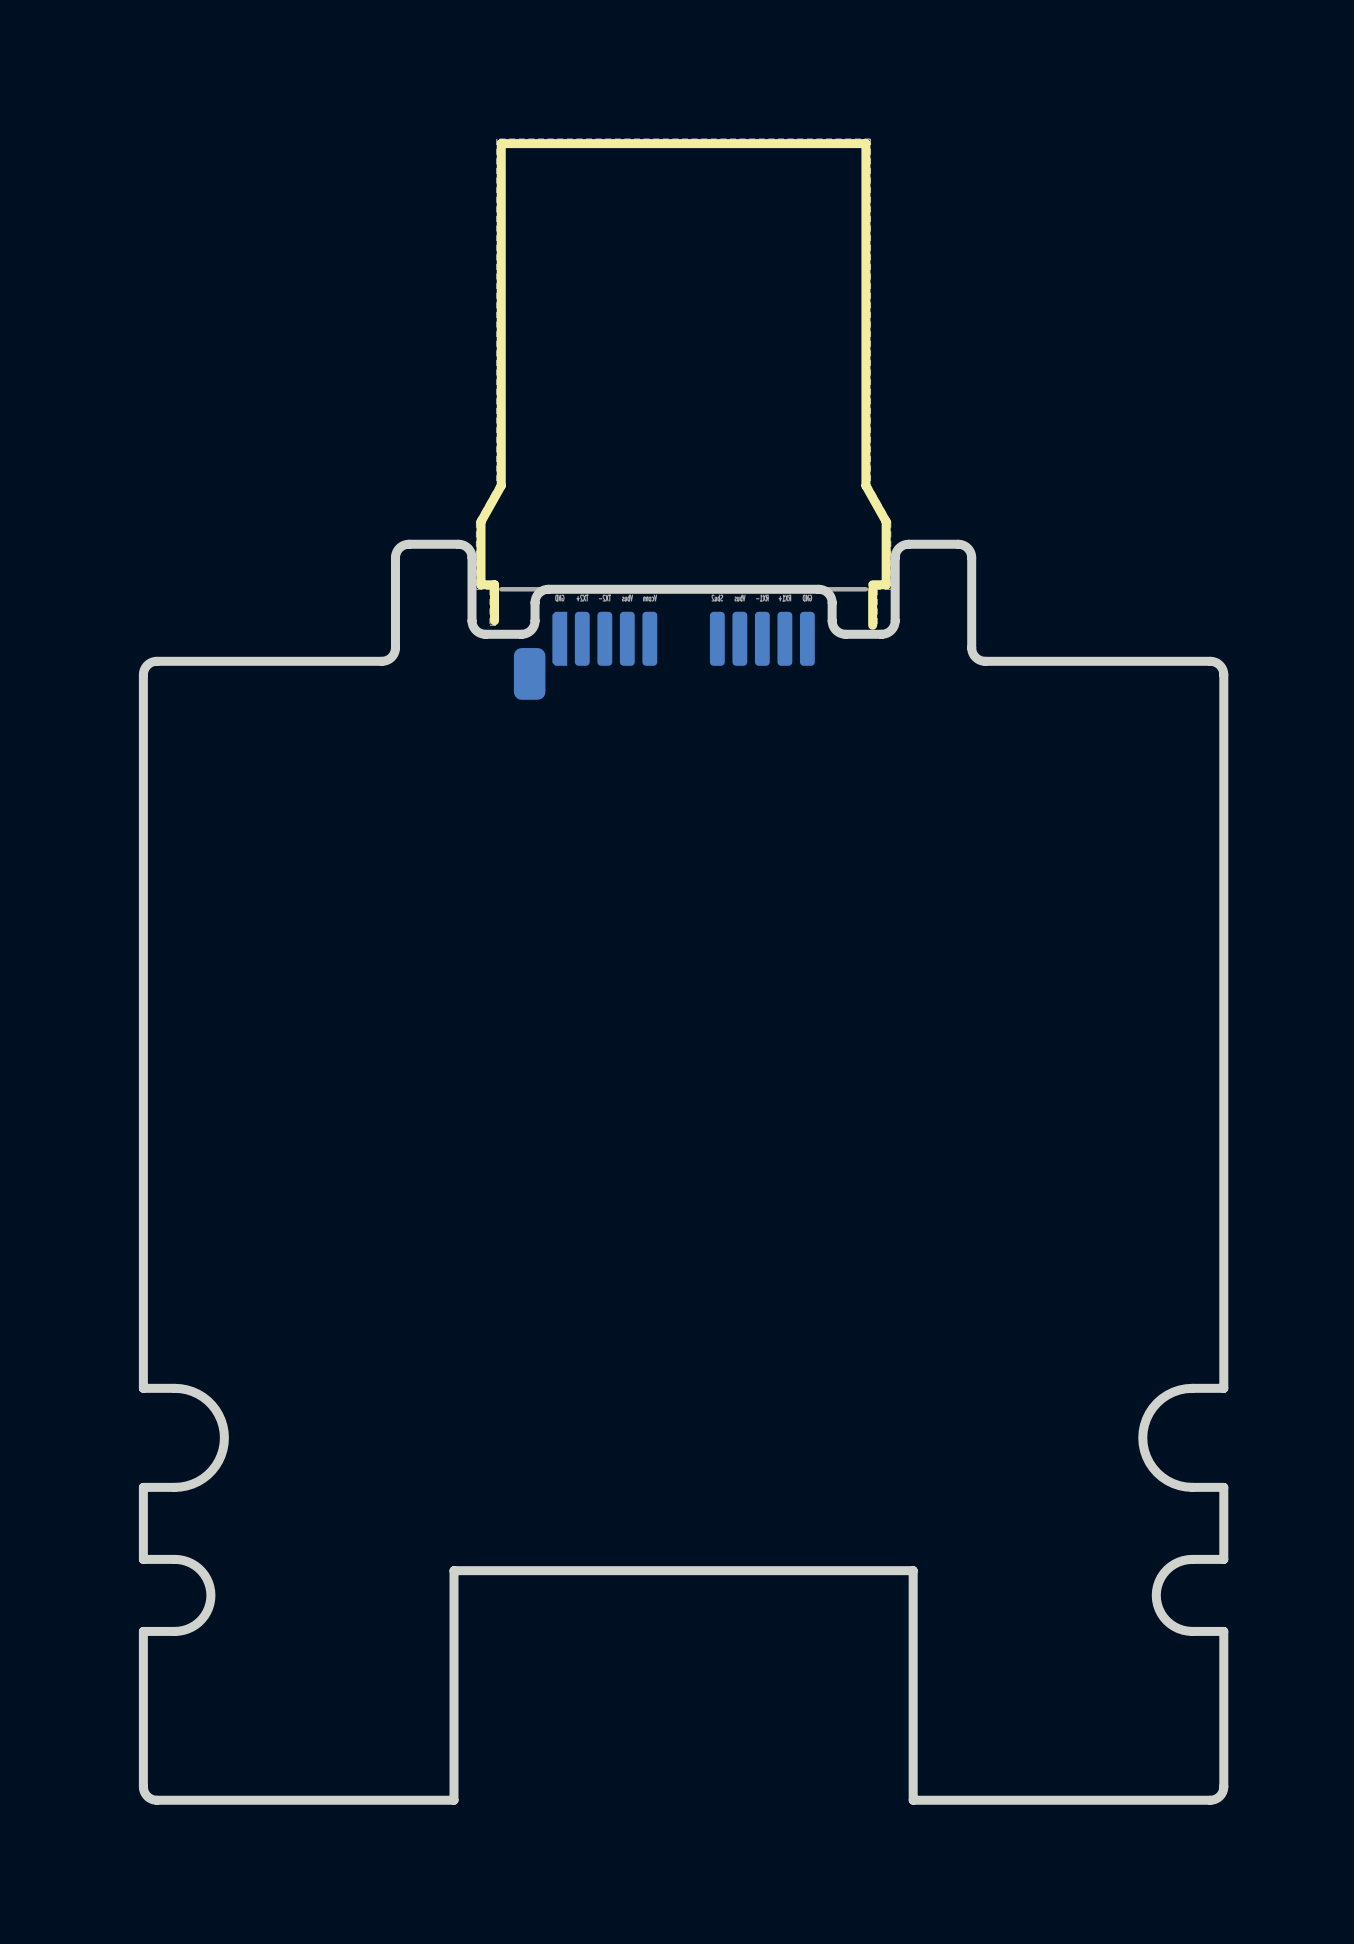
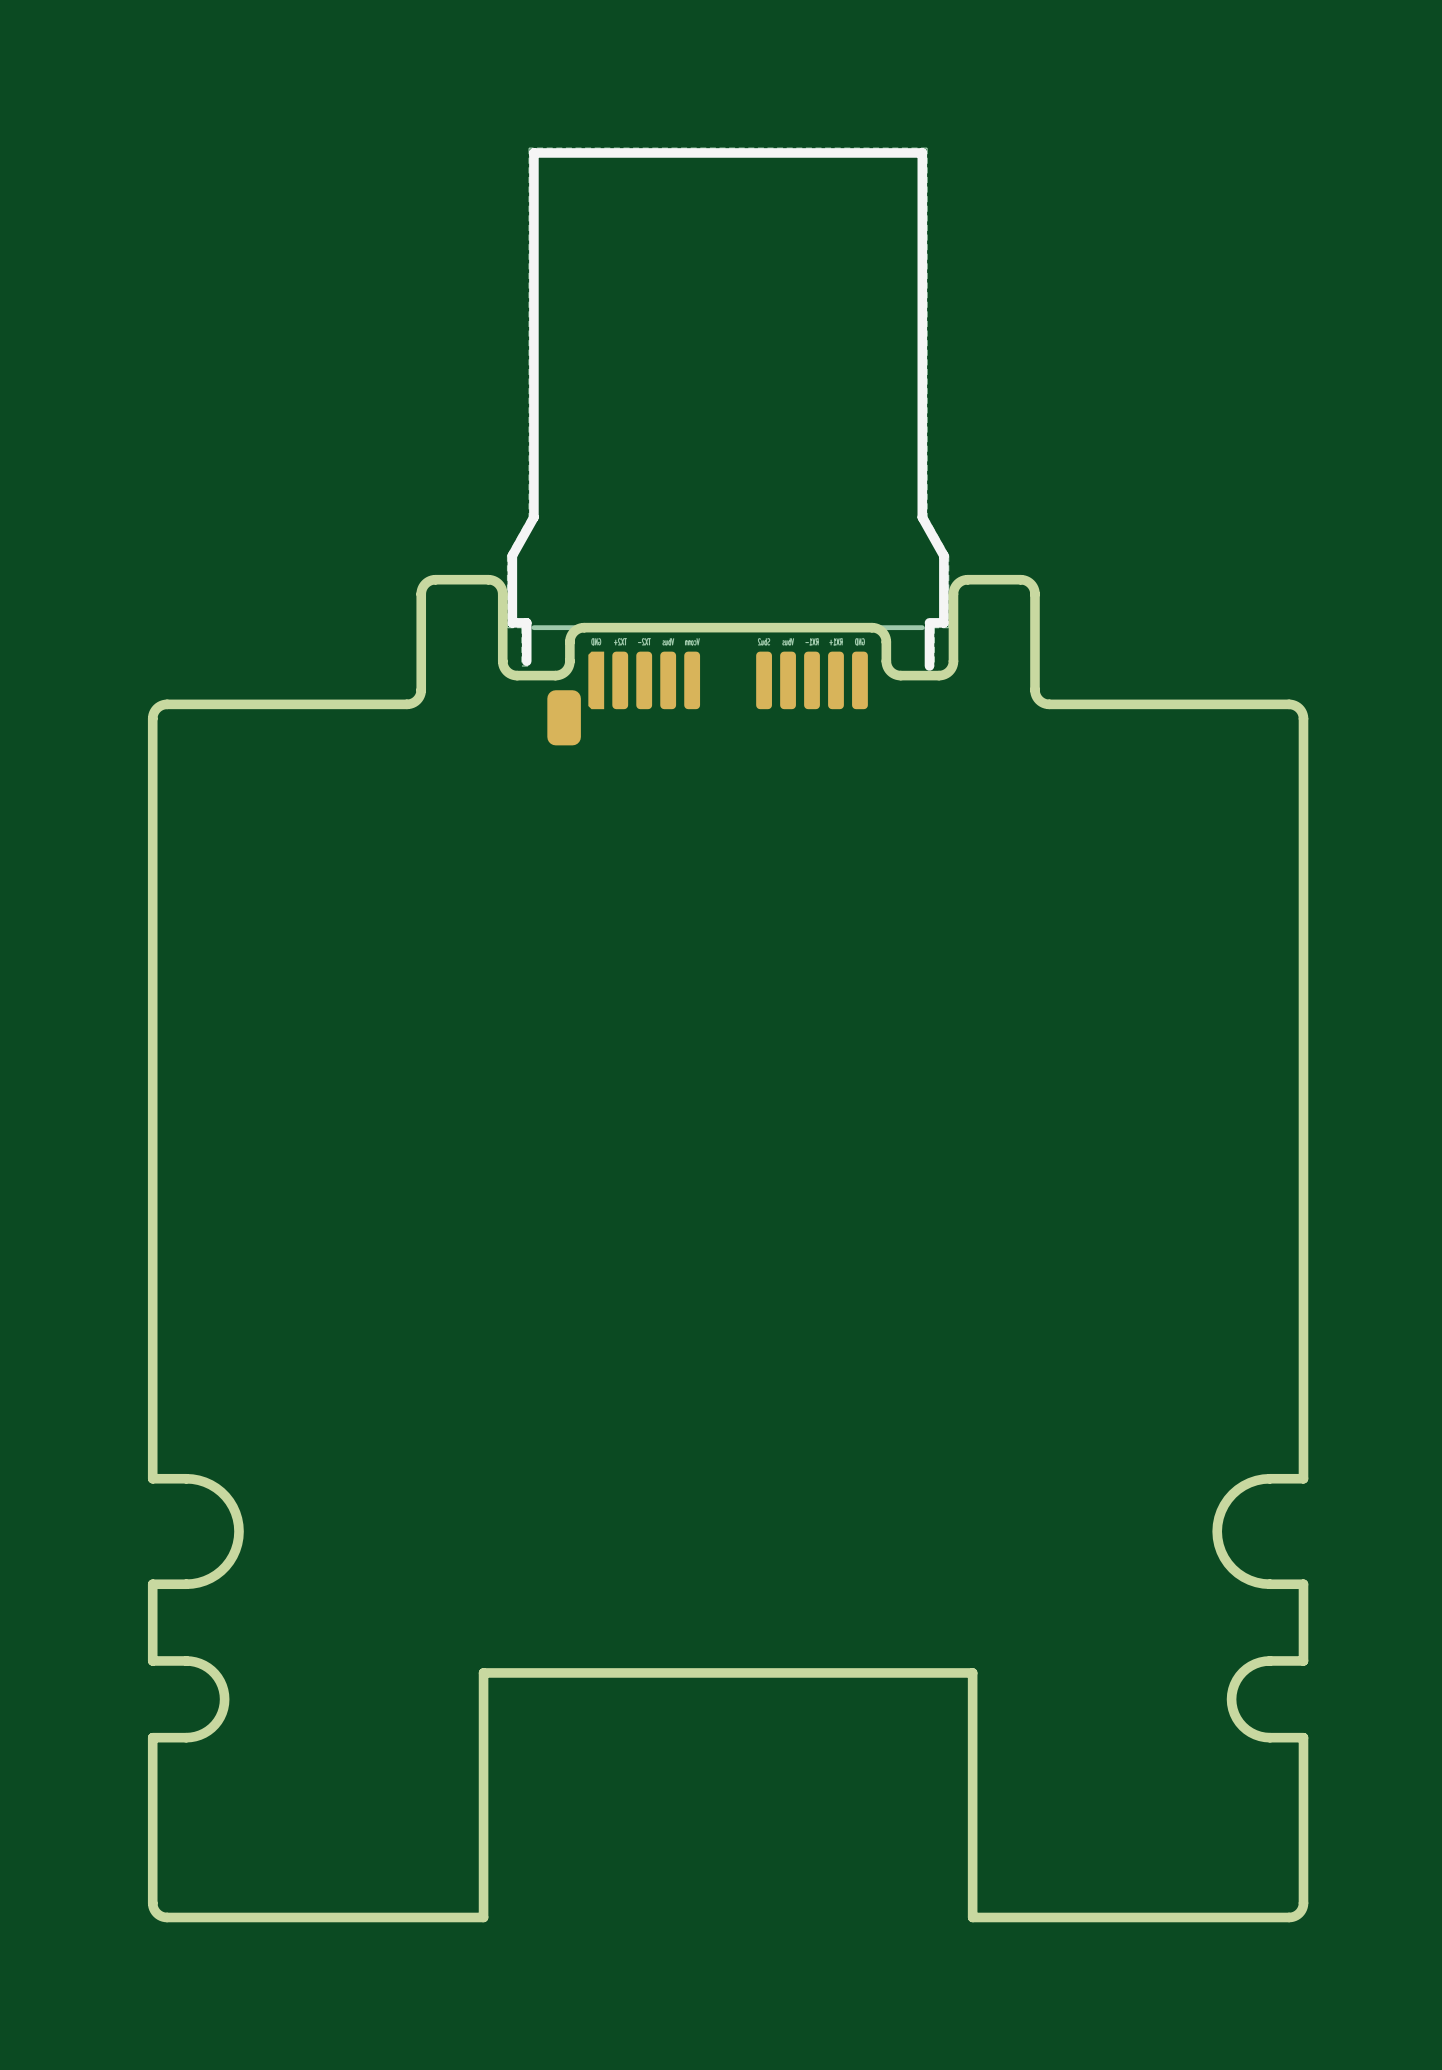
part footprint: [476, 138, 891, 700] -> [507, 147, 949, 746]

